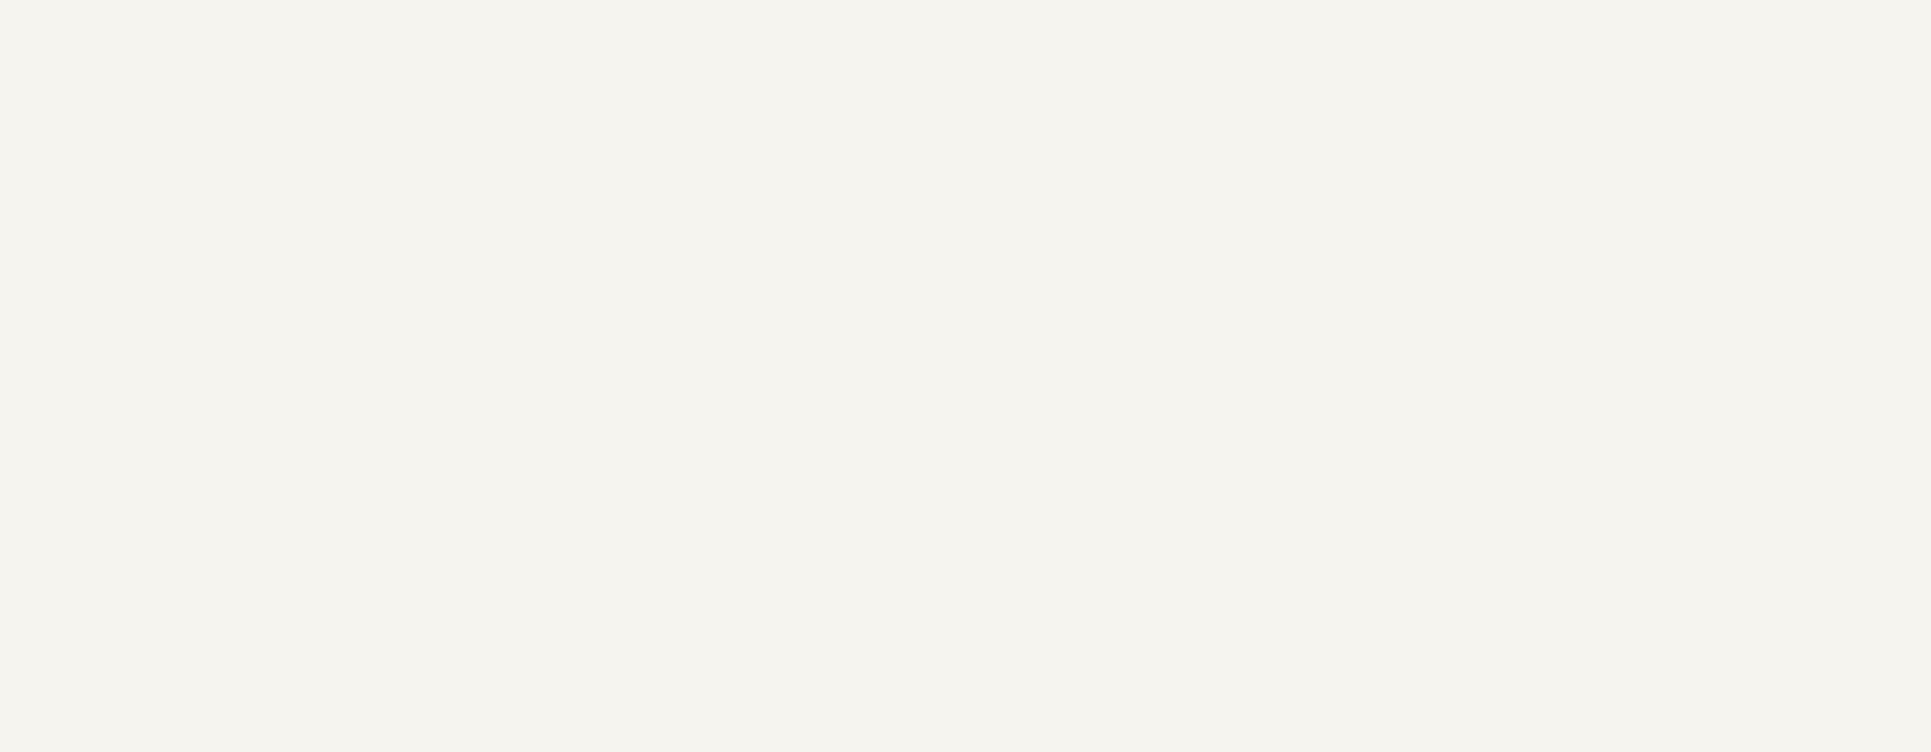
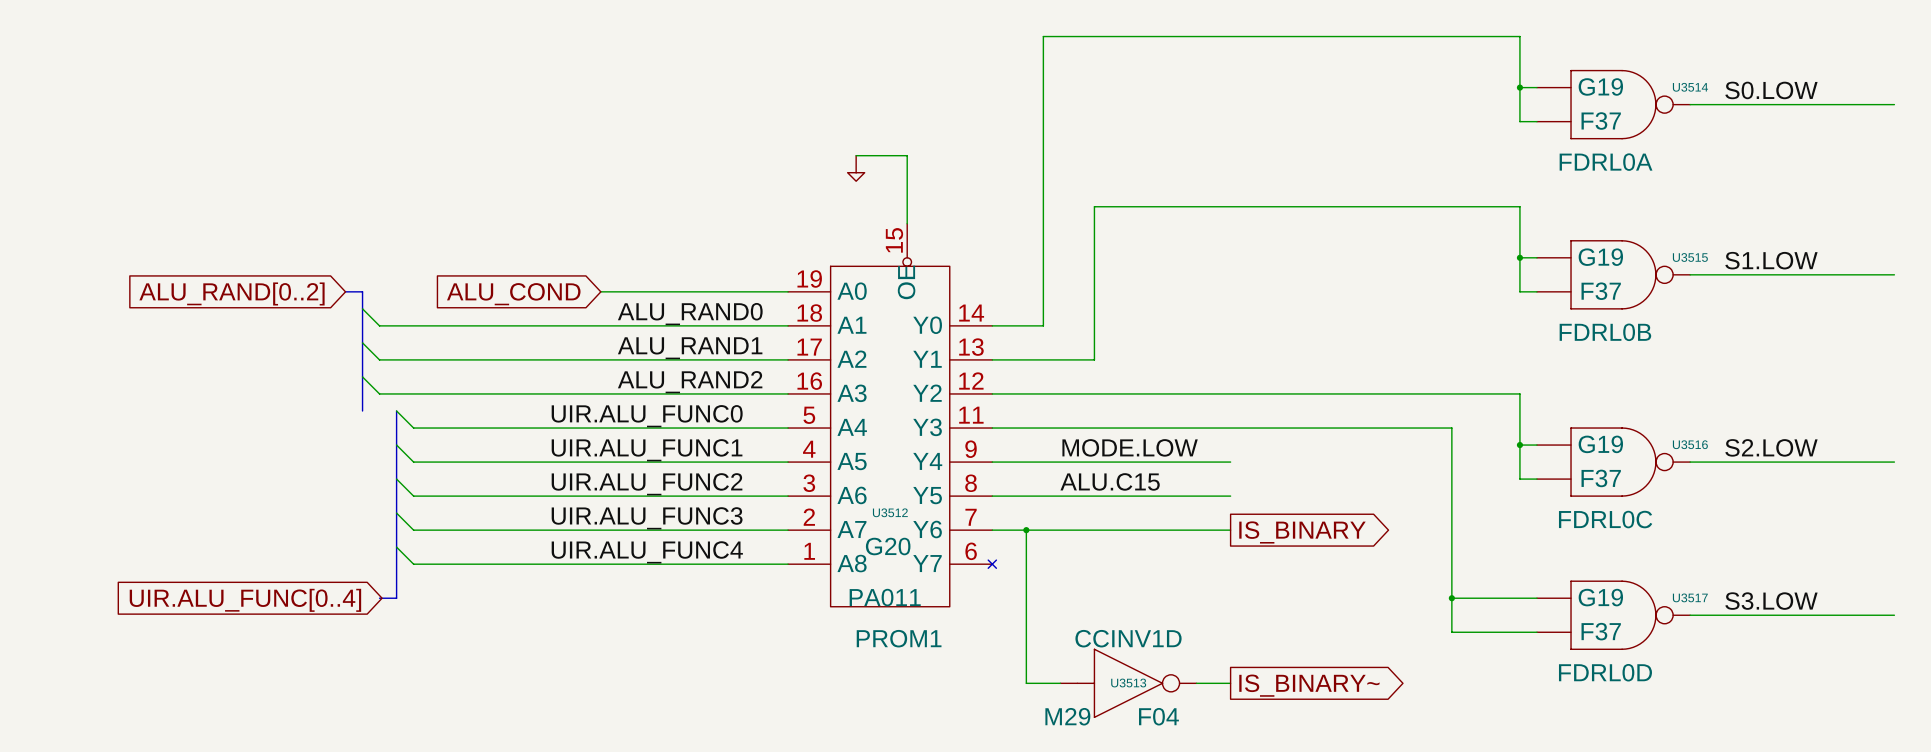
wire: none -> (1519, 87) (1536, 87)
junction: none -> (1519, 87)
label: none -> S0.LOW (1771, 90)
U3514: none -> F37 (1613, 104)
wire: none -> (1690, 104) (1894, 104)
wire: none -> (1536, 121) (1519, 121) (1519, 36) (1043, 36) (1043, 325) (992, 325)
wire: none -> (856, 155) (907, 155) (907, 223)
power symbol: none -> (856, 168)
wire: none -> (1519, 257) (1536, 257)
junction: none -> (1519, 257)
label: none -> S1.LOW (1771, 260)
U3515: none -> F37 (1613, 274)
wire: none -> (1690, 274) (1894, 274)
bus: none -> (345, 291) (362, 291) (362, 410)
wire: none -> (600, 291) (788, 291)
wire: none -> (1536, 291) (1519, 291) (1519, 206) (1094, 206) (1094, 359) (992, 359)
global label: none -> ALU_RAND[0..2] (232, 293)
global label: none -> ALU_COND (513, 294)
wire: none -> (362, 308) (379, 325) (788, 325)
label: none -> ALU_RAND0 (690, 314)
wire: none -> (362, 342) (379, 359) (788, 359)
label: none -> ALU_RAND1 (690, 348)
wire: none -> (362, 376) (379, 393) (788, 393)
label: none -> ALU_RAND2 (690, 382)
wire: none -> (992, 393) (1519, 393) (1519, 479) (1536, 479)
bus: none -> (396, 410) (396, 598) (379, 598)
wire: none -> (396, 410) (413, 428) (788, 428)
U3512: none -> PA011 (890, 415)
label: none -> UIR.ALU_FUNC0 (647, 416)
wire: none -> (992, 428) (1451, 428) (1451, 632) (1536, 632)
wire: none -> (396, 445) (413, 462) (788, 462)
wire: none -> (1519, 445) (1536, 445)
junction: none -> (1519, 445)
label: none -> MODE.LOW (1130, 447)
label: none -> S2.LOW (1771, 447)
label: none -> UIR.ALU_FUNC1 (647, 450)
wire: none -> (992, 462) (1230, 462)
U3516: none -> F37 (1613, 462)
wire: none -> (1690, 462) (1894, 462)
wire: none -> (396, 479) (413, 496) (788, 496)
label: none -> ALU.C15 (1110, 481)
label: none -> UIR.ALU_FUNC2 (647, 484)
wire: none -> (992, 496) (1230, 496)
wire: none -> (396, 513) (413, 530) (788, 530)
label: none -> UIR.ALU_FUNC3 (647, 518)
wire: none -> (992, 530) (1230, 530)
wire: none -> (1026, 530) (1026, 683) (1060, 683)
junction: none -> (1026, 530)
global label: none -> IS_BINARY (1302, 532)
wire: none -> (396, 547) (413, 564) (788, 564)
label: none -> UIR.ALU_FUNC4 (647, 552)
no-connect mark: none -> (992, 564)
wire: none -> (1451, 598) (1536, 598)
junction: none -> (1451, 598)
global label: none -> UIR.ALU_FUNC[0..4] (245, 600)
label: none -> S3.LOW (1771, 601)
U3517: none -> F37 (1613, 615)
wire: none -> (1690, 615) (1894, 615)
U3513: none -> F04 (1128, 683)
wire: none -> (1196, 683) (1230, 683)
global label: none -> IS_BINARY~ (1309, 685)

